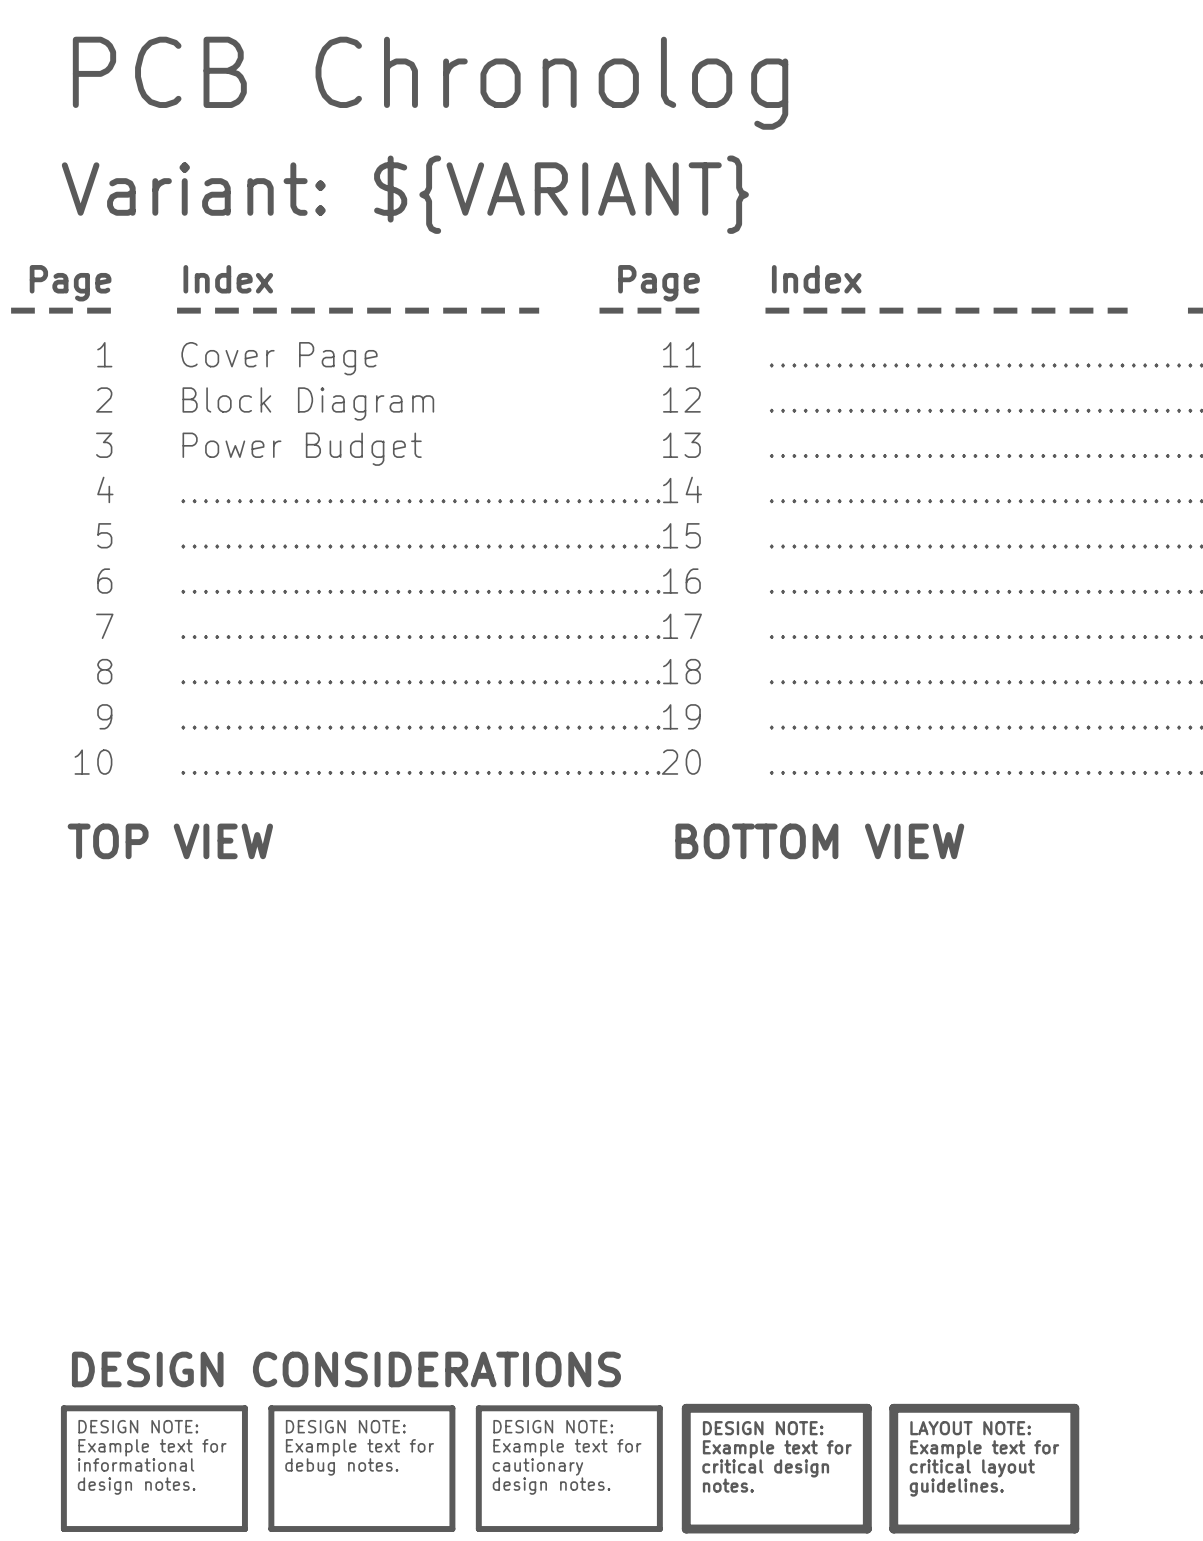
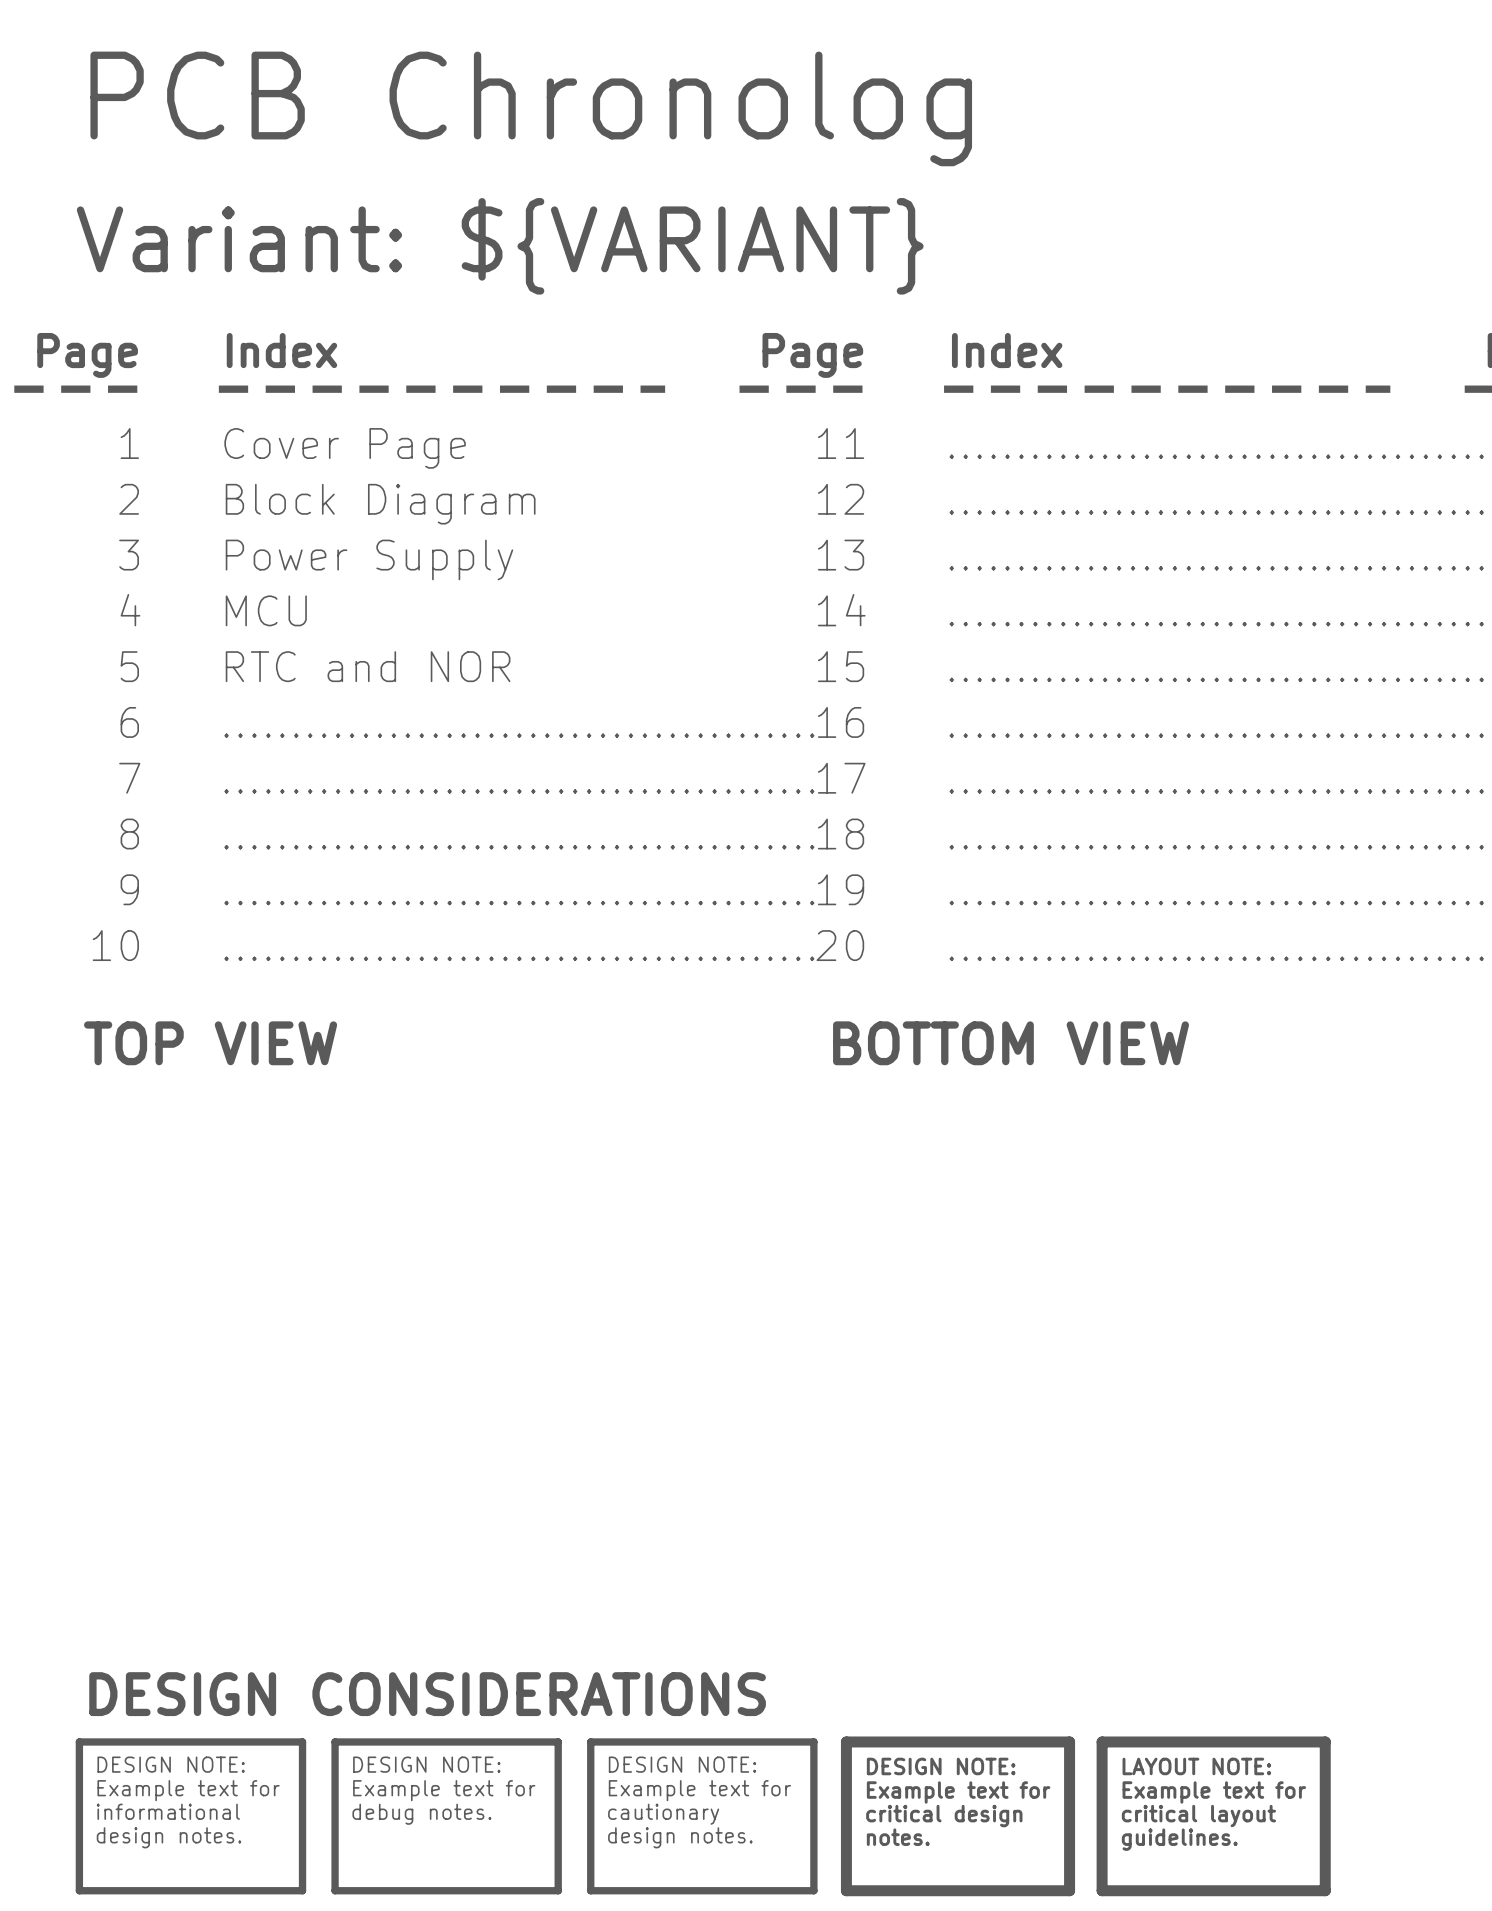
text: Power Budget (302, 449) -> Power Supply (369, 559)
text: ........................................... (420, 501) -> MCU (266, 610)
text: ........................................... (420, 546) -> RTC and NOR (368, 666)

